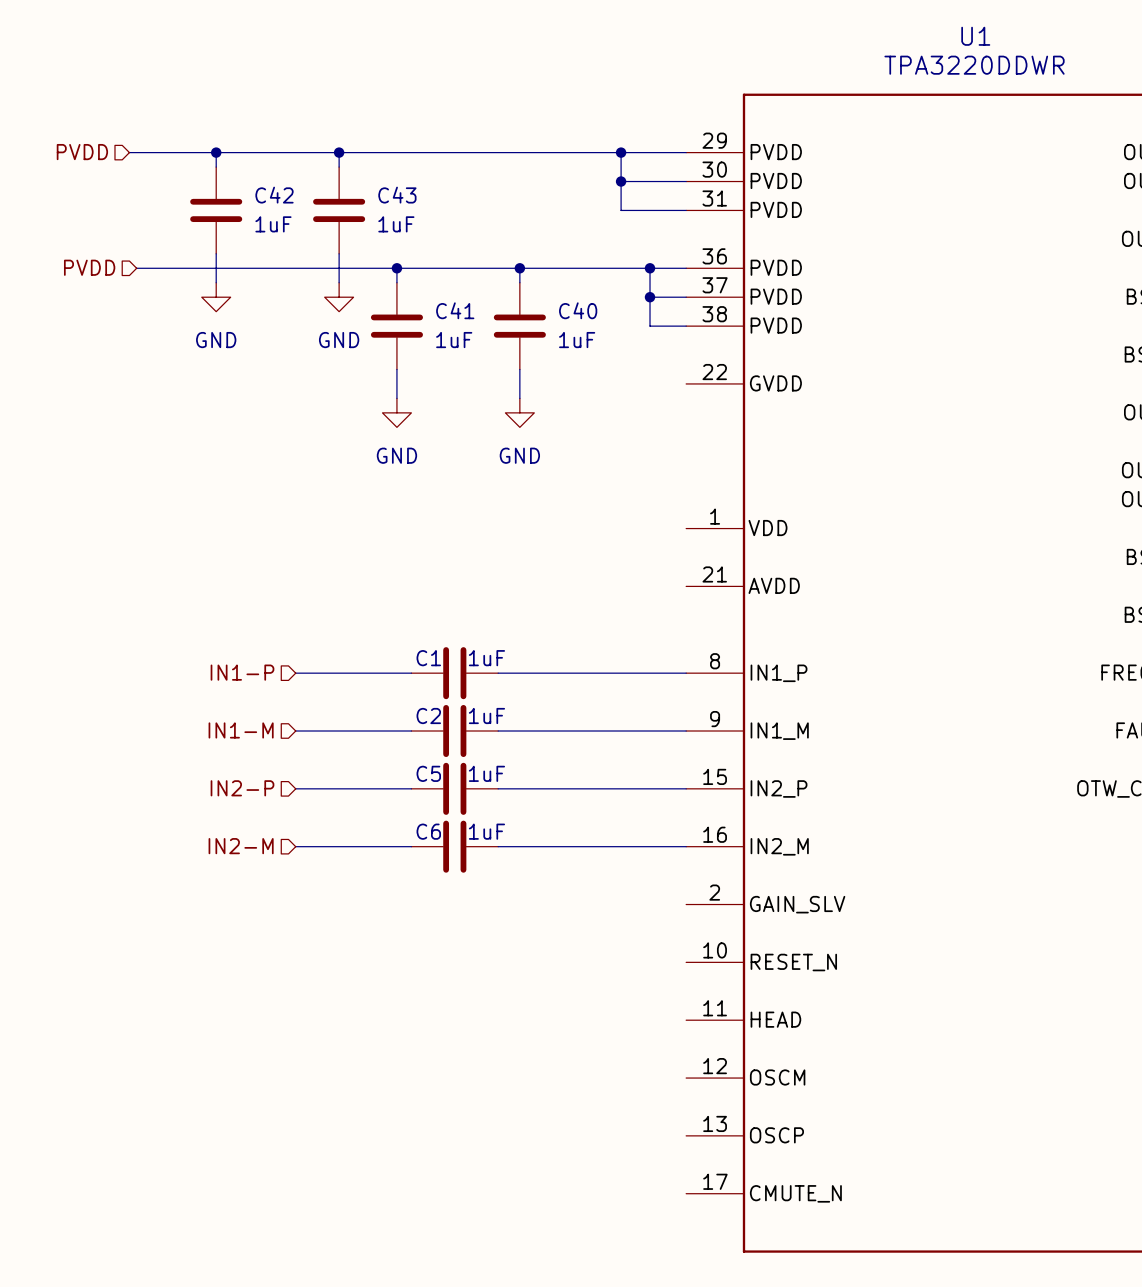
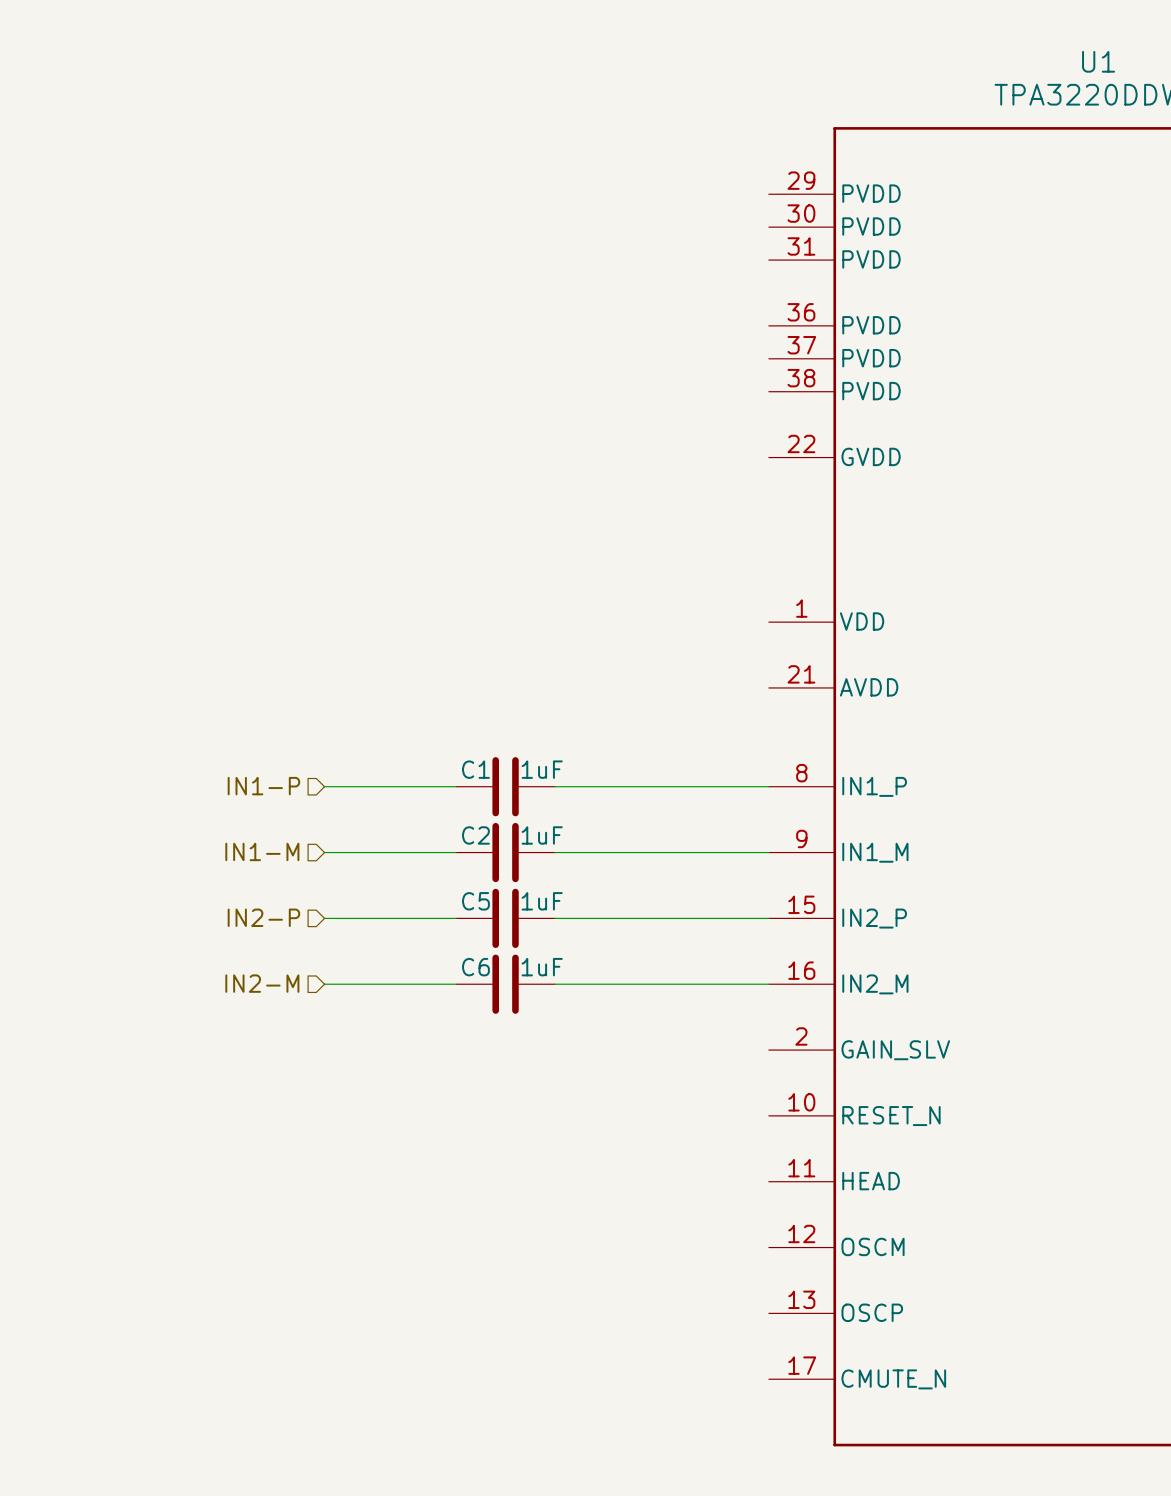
hierarchical label: PVDD (82, 152) -> none
wire: (129, 152) (686, 152) -> none
wire: (216, 152) (216, 167) -> none
junction: (216, 152) -> none
wire: (339, 152) (339, 167) -> none
junction: (339, 152) -> none
wire: (621, 152) (621, 210) (686, 210) -> none
junction: (621, 152) -> none
wire: (621, 181) (686, 181) -> none
junction: (621, 181) -> none
C42: 1uF (216, 210) -> none
C43: 1uF (339, 210) -> none
wire: (216, 253) (216, 282) -> none
wire: (339, 253) (339, 282) -> none
hierarchical label: PVDD (89, 267) -> none
wire: (136, 268) (686, 268) -> none
wire: (396, 268) (396, 282) -> none
junction: (396, 268) -> none
wire: (519, 268) (519, 282) -> none
junction: (519, 268) -> none
wire: (650, 268) (650, 326) (686, 326) -> none
junction: (650, 268) -> none
power symbol: GND (216, 297) -> none
power symbol: GND (339, 297) -> none
wire: (650, 297) (686, 297) -> none
junction: (650, 297) -> none
C41: 1uF (396, 326) -> none
C40: 1uF (519, 326) -> none
wire: (396, 369) (396, 398) -> none
wire: (519, 369) (519, 398) -> none
power symbol: GND (396, 412) -> none
power symbol: GND (519, 412) -> none

